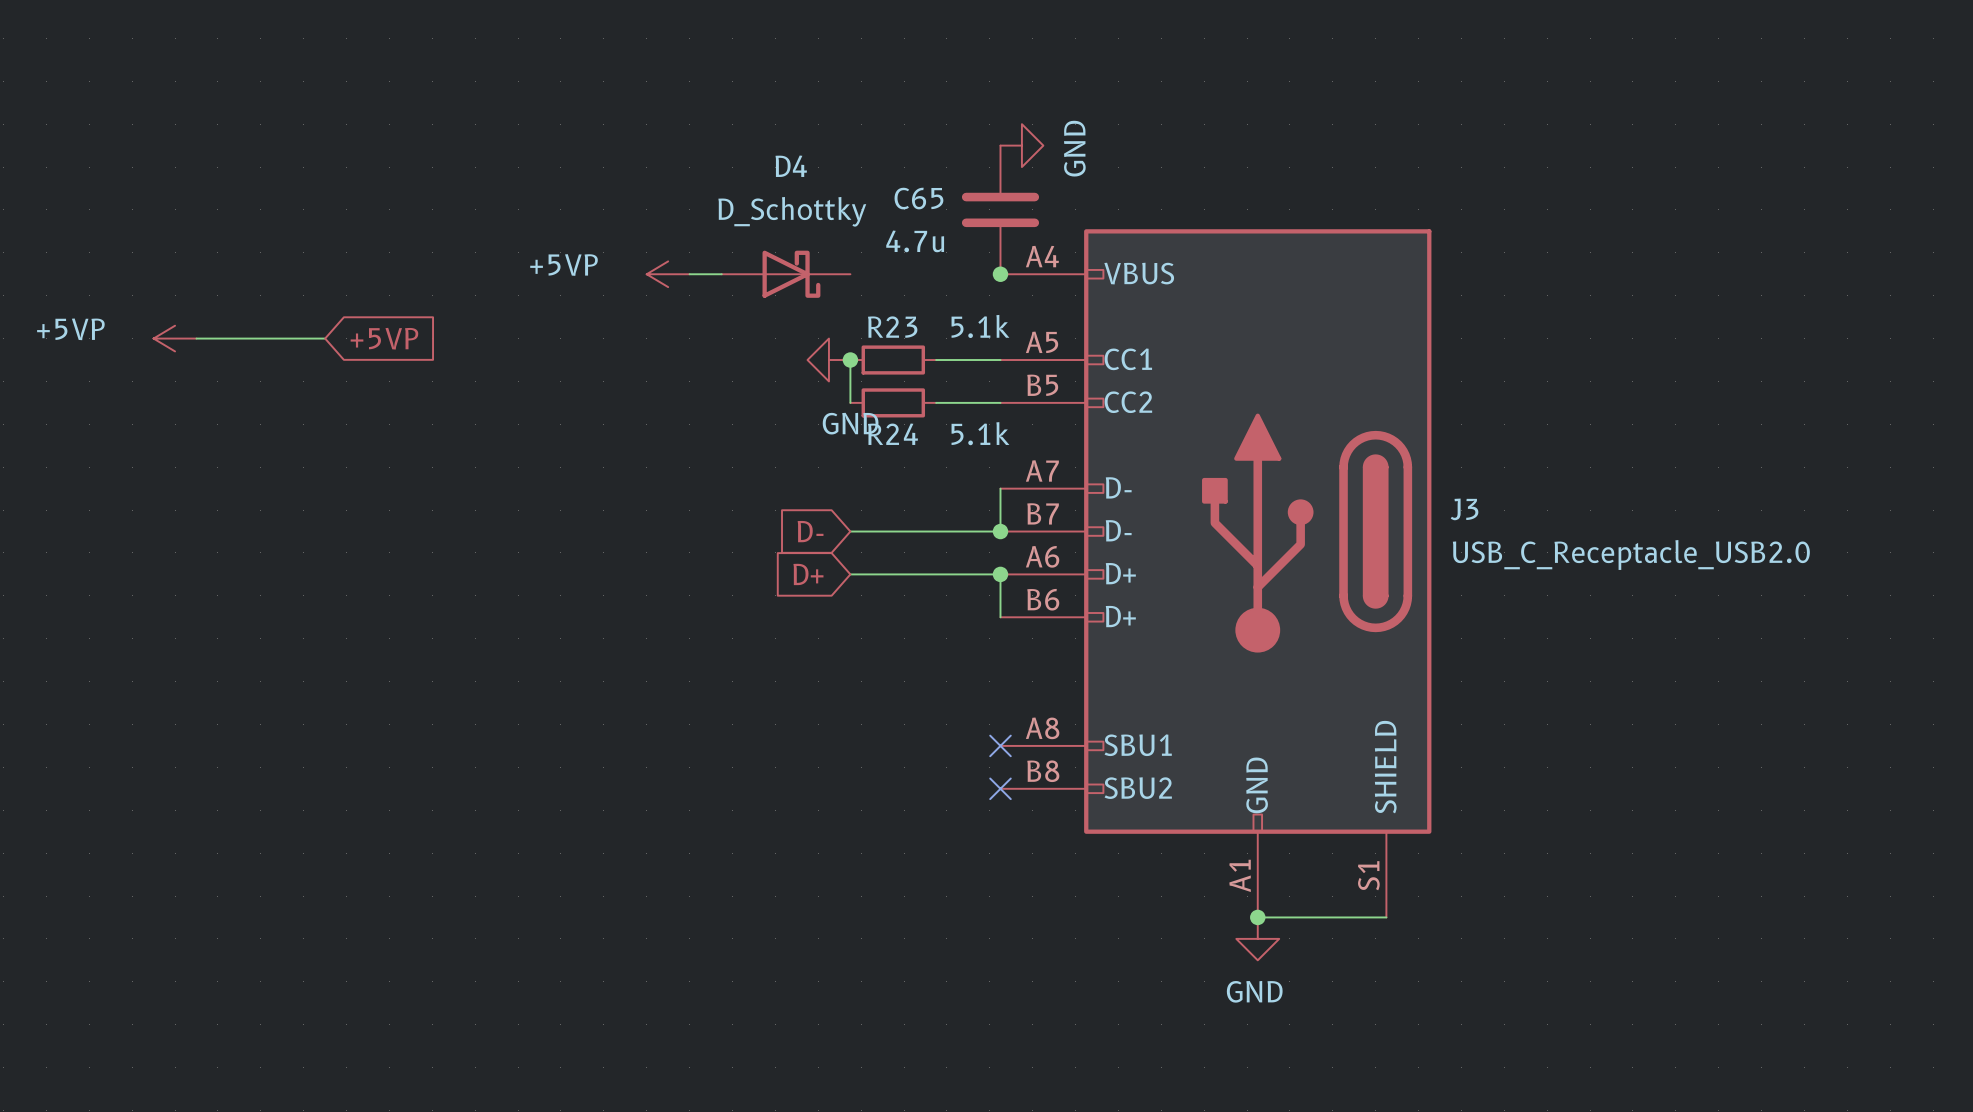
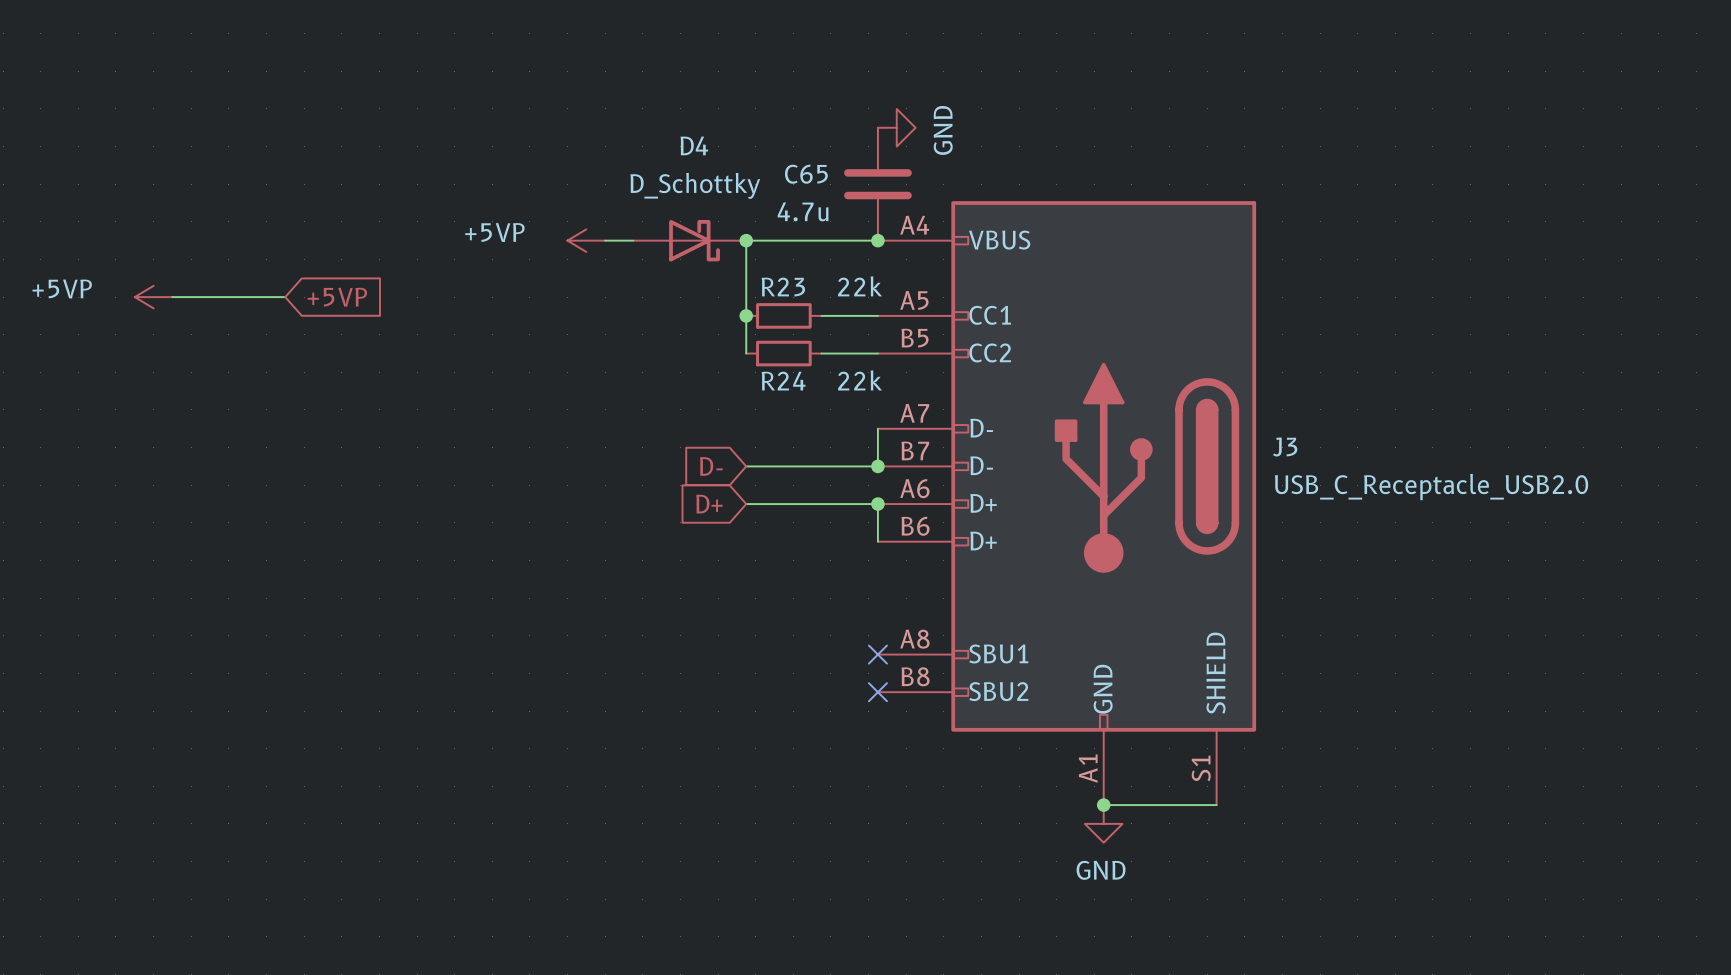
junction: none -> (746, 240)
wire: none -> (877, 240) (746, 240) (746, 315)
R23 value: 5.1k (980, 326) -> 22k (860, 286)
power symbol: GND (828, 360) -> none
R24 value: 5.1k (980, 433) -> 22k (860, 380)

